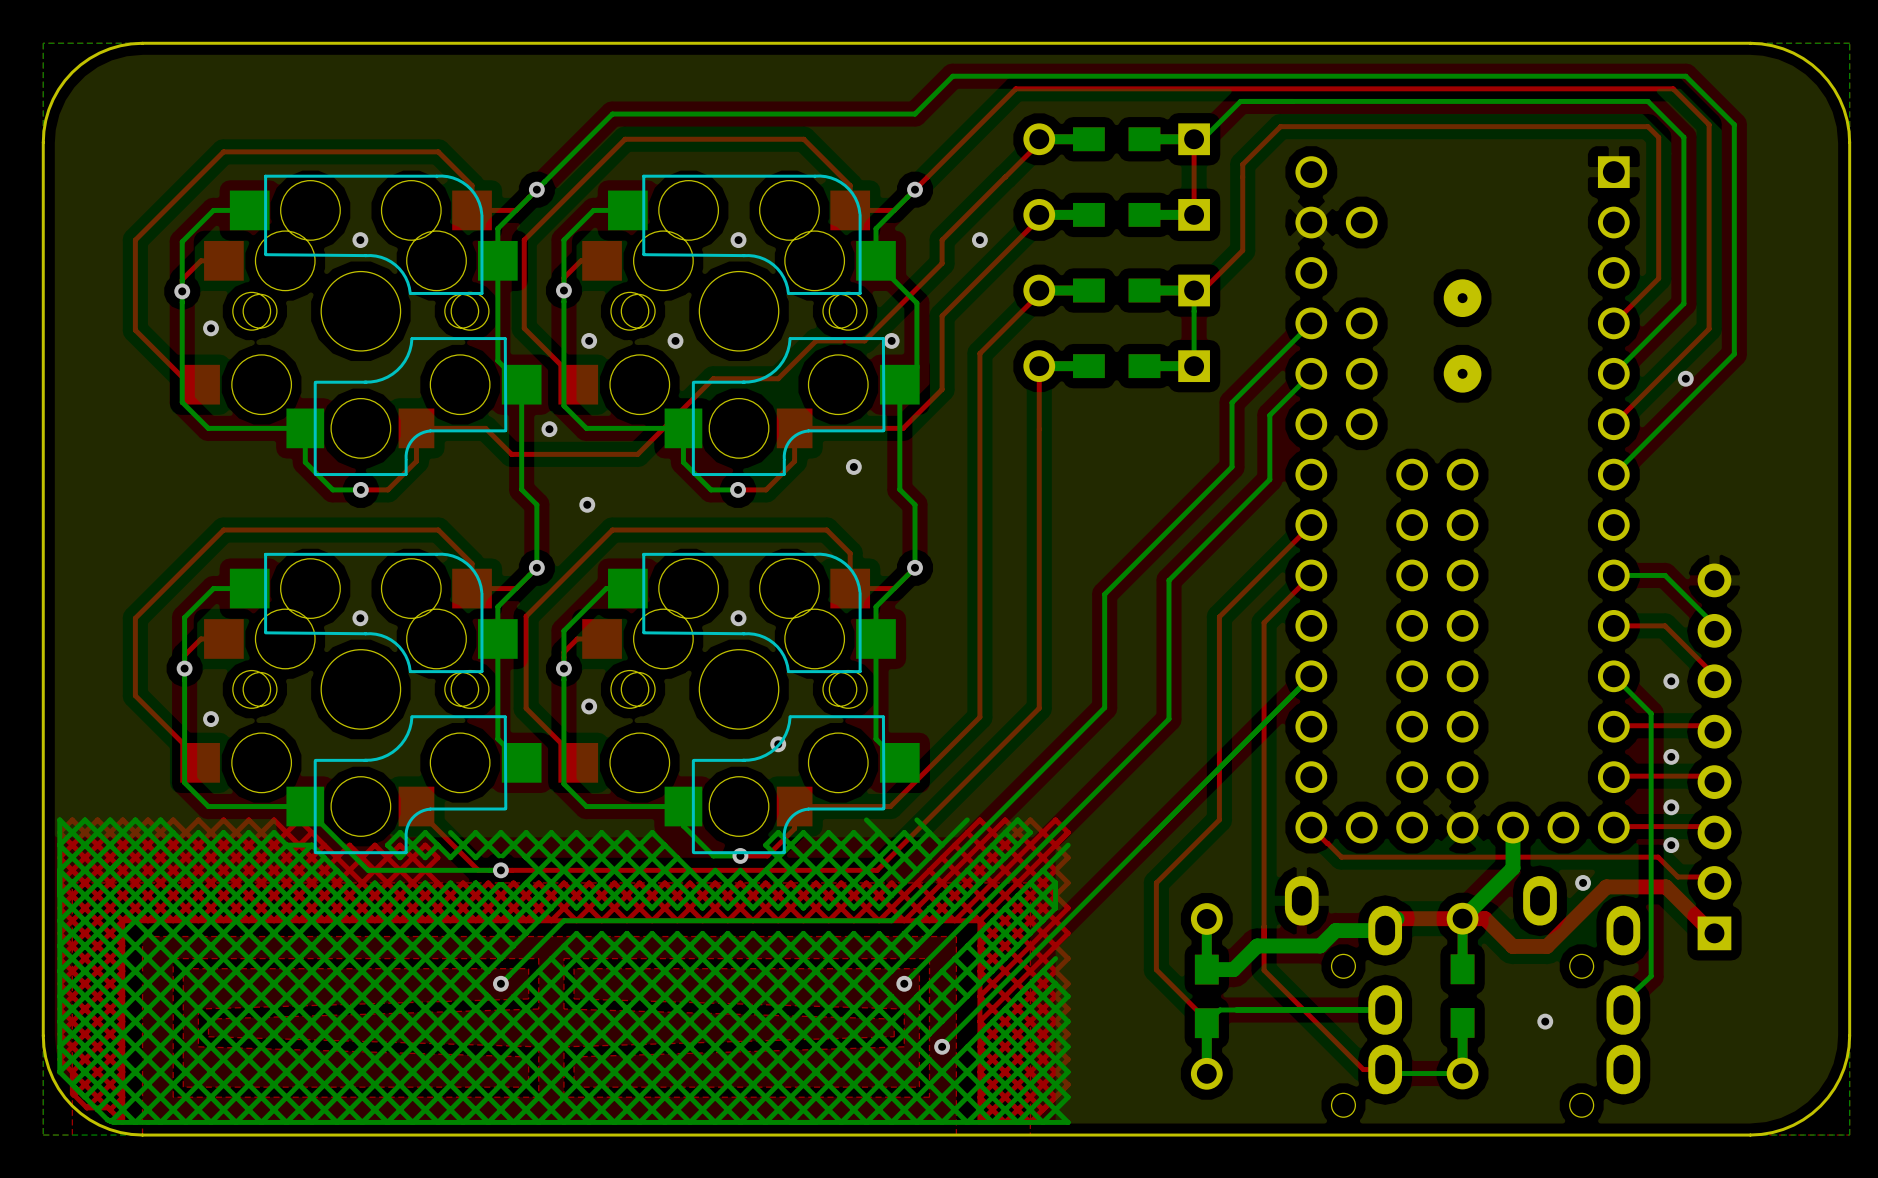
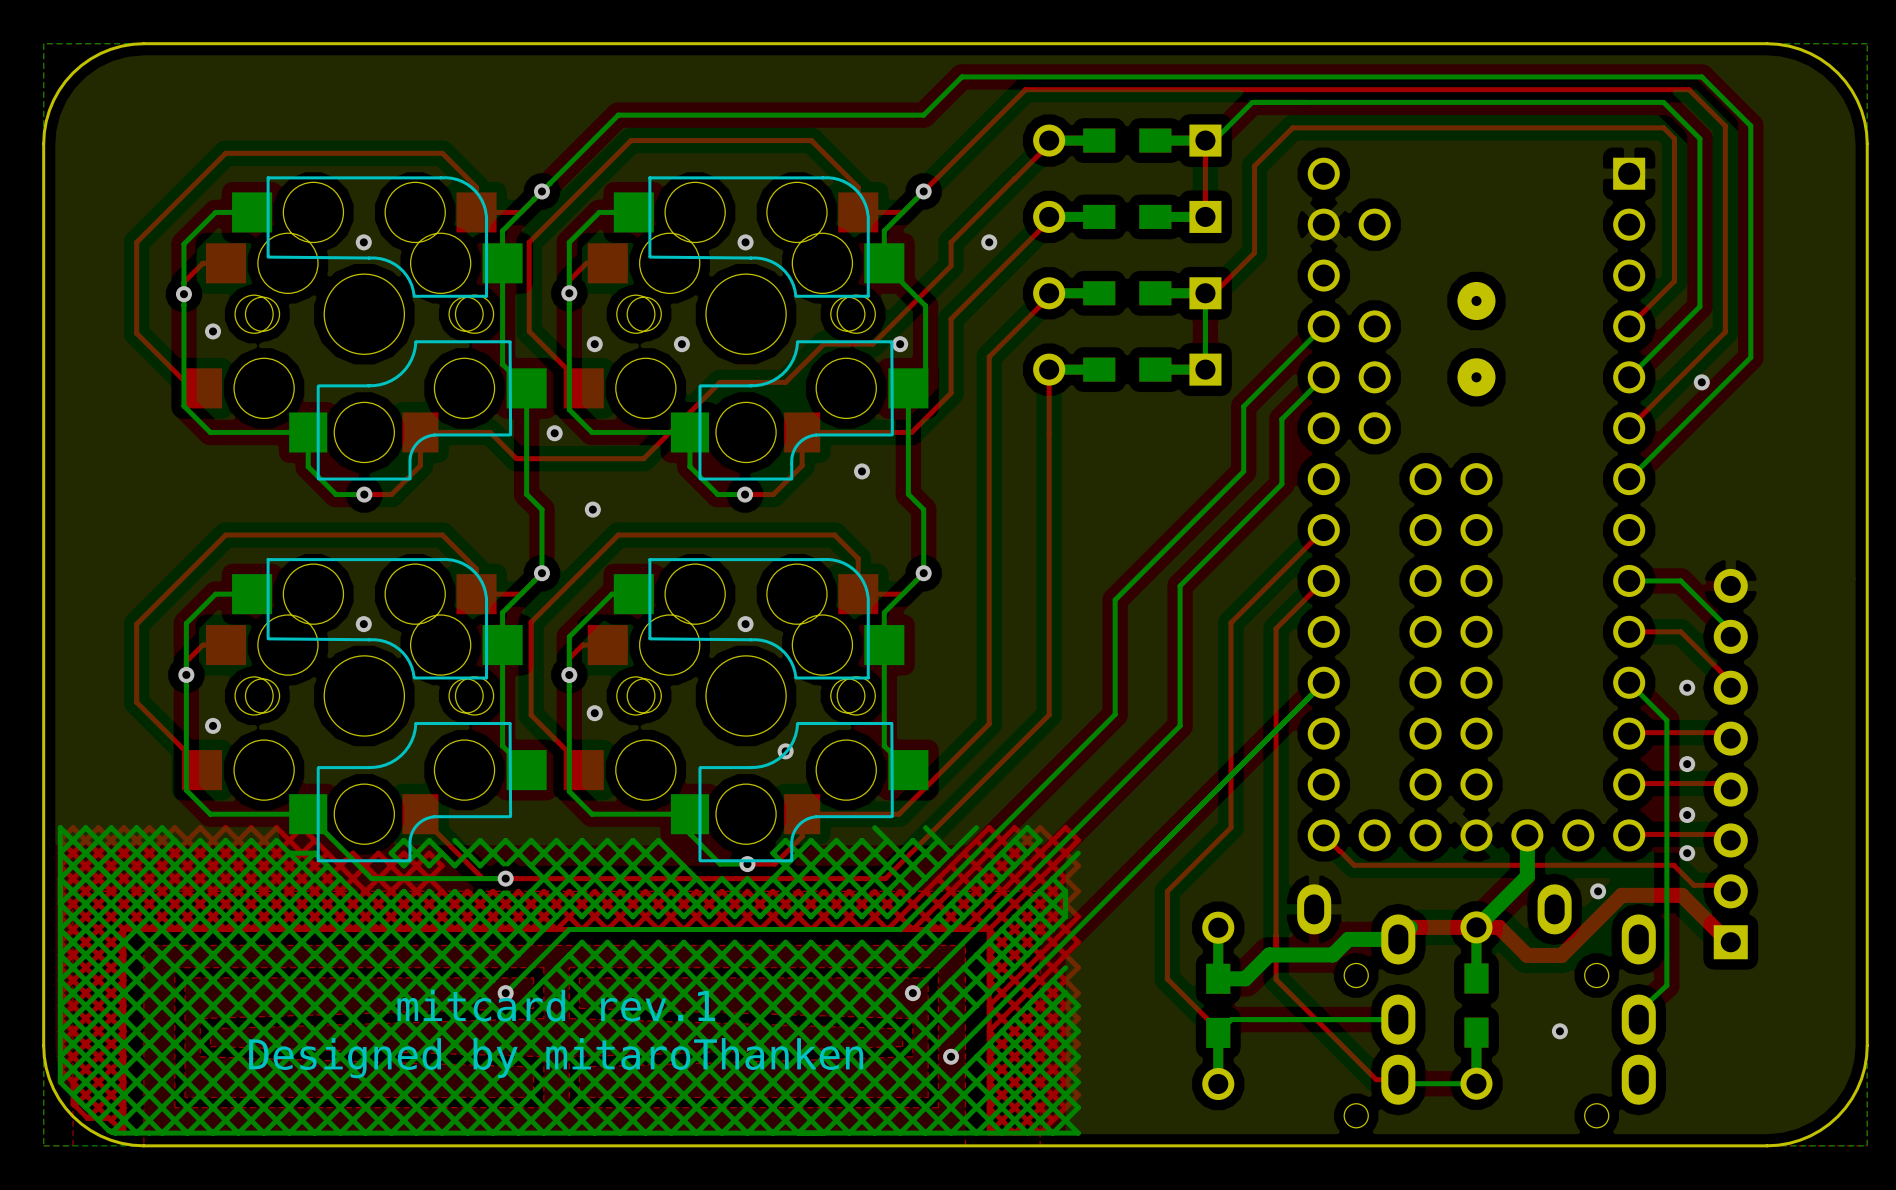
text: none -> mitcard rev.1 (556, 1005)
text: none -> Designed by mitaroThanken (556, 1058)

